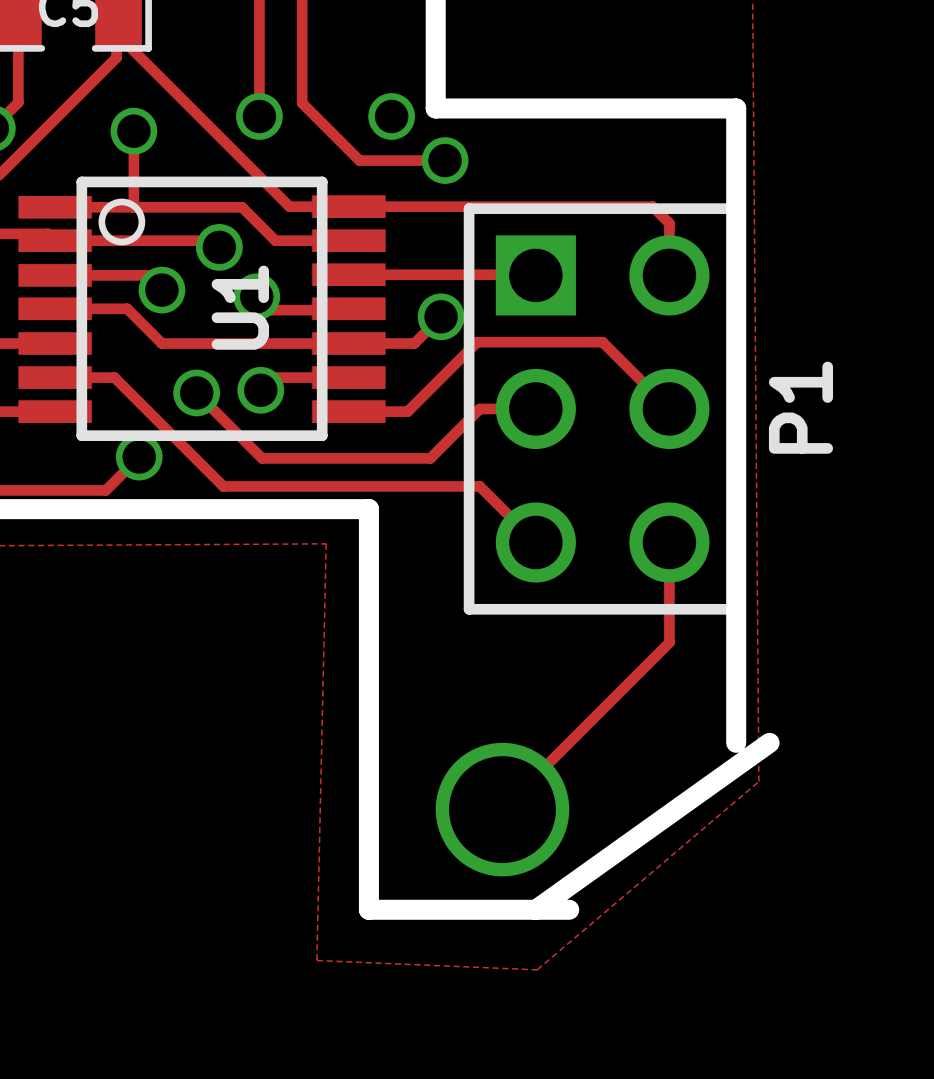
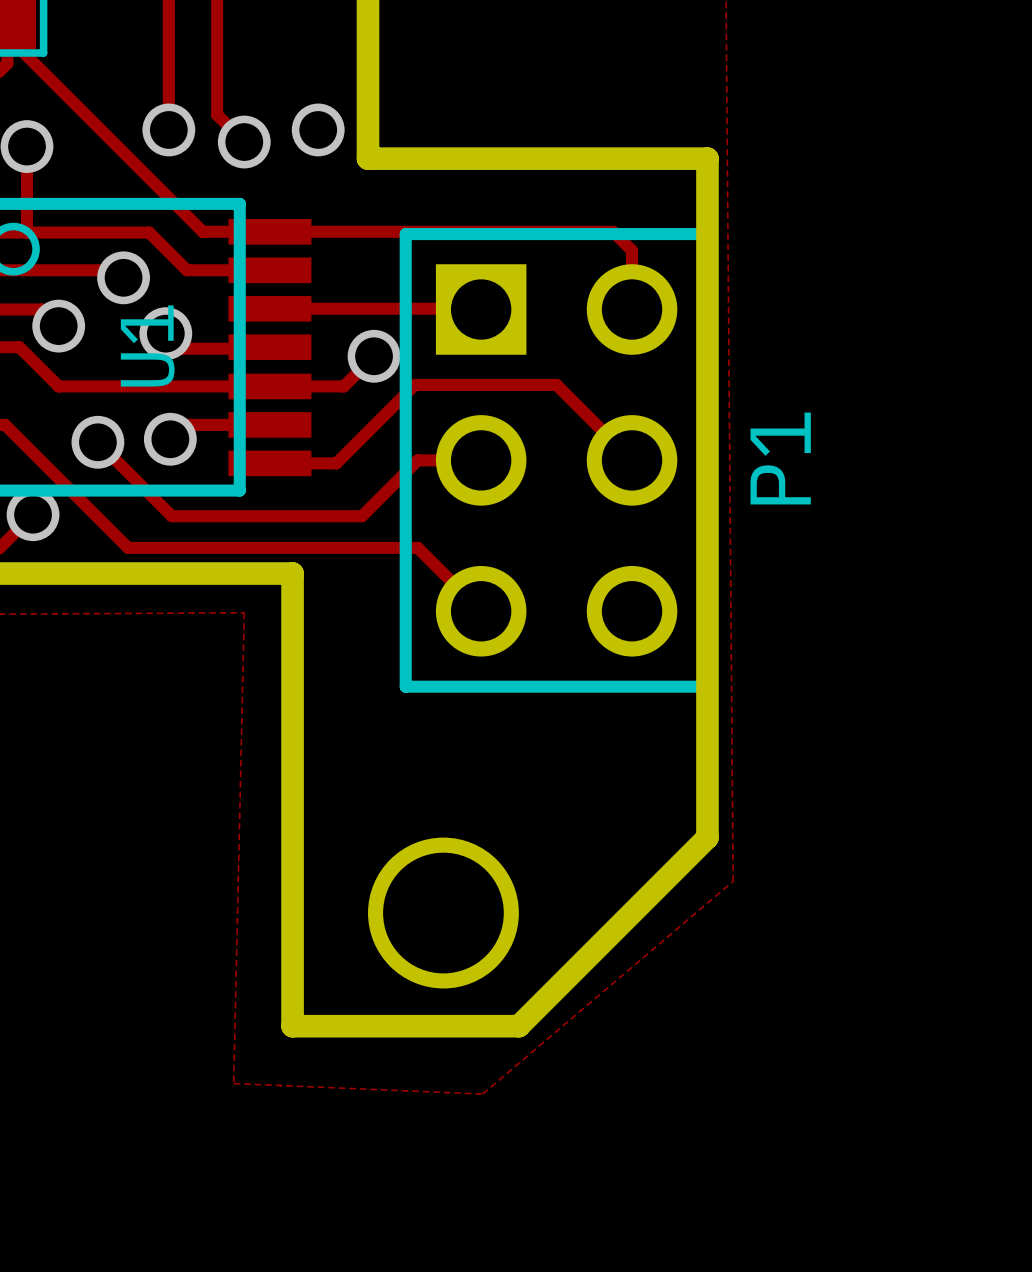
board edge: (435, 108) (736, 108) (736, 141) -> (368, 120) (368, 158) (707, 158)
track: (326, 127) (359, 160) (445, 160) -> none
via position: (445, 160) -> (244, 142)
track: (669, 542) (669, 642) (502, 809) -> none
board edge: none -> (707, 837) (518, 1026)
board edge: (769, 742) (535, 909) -> none

